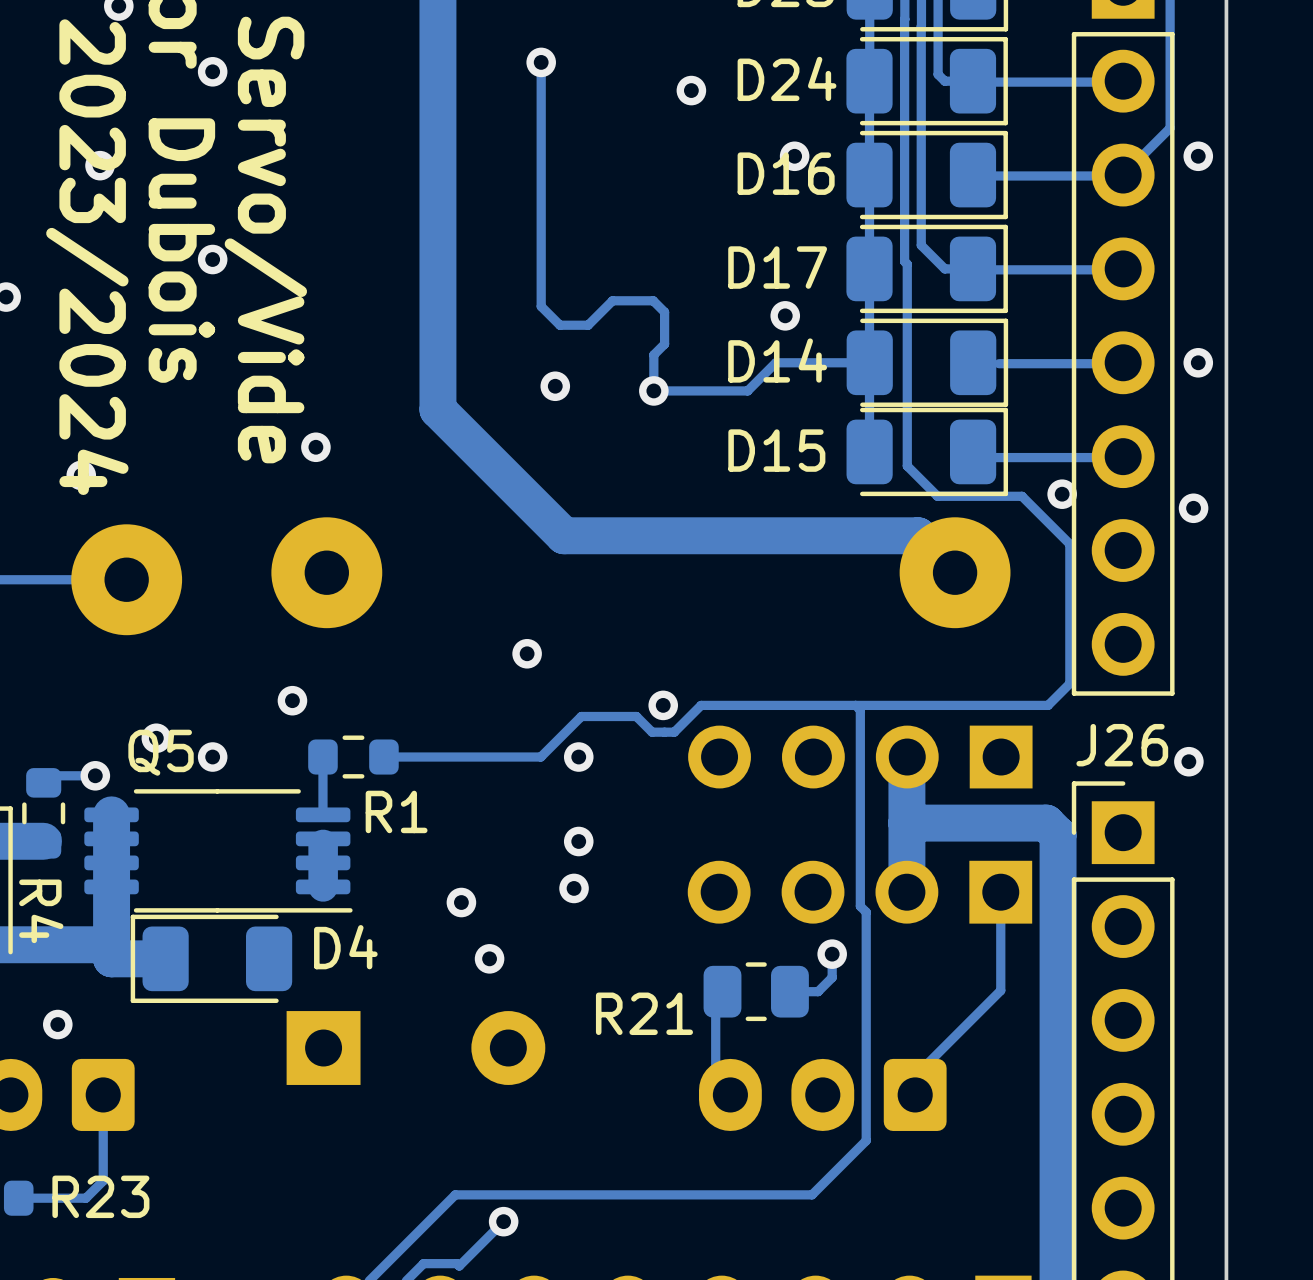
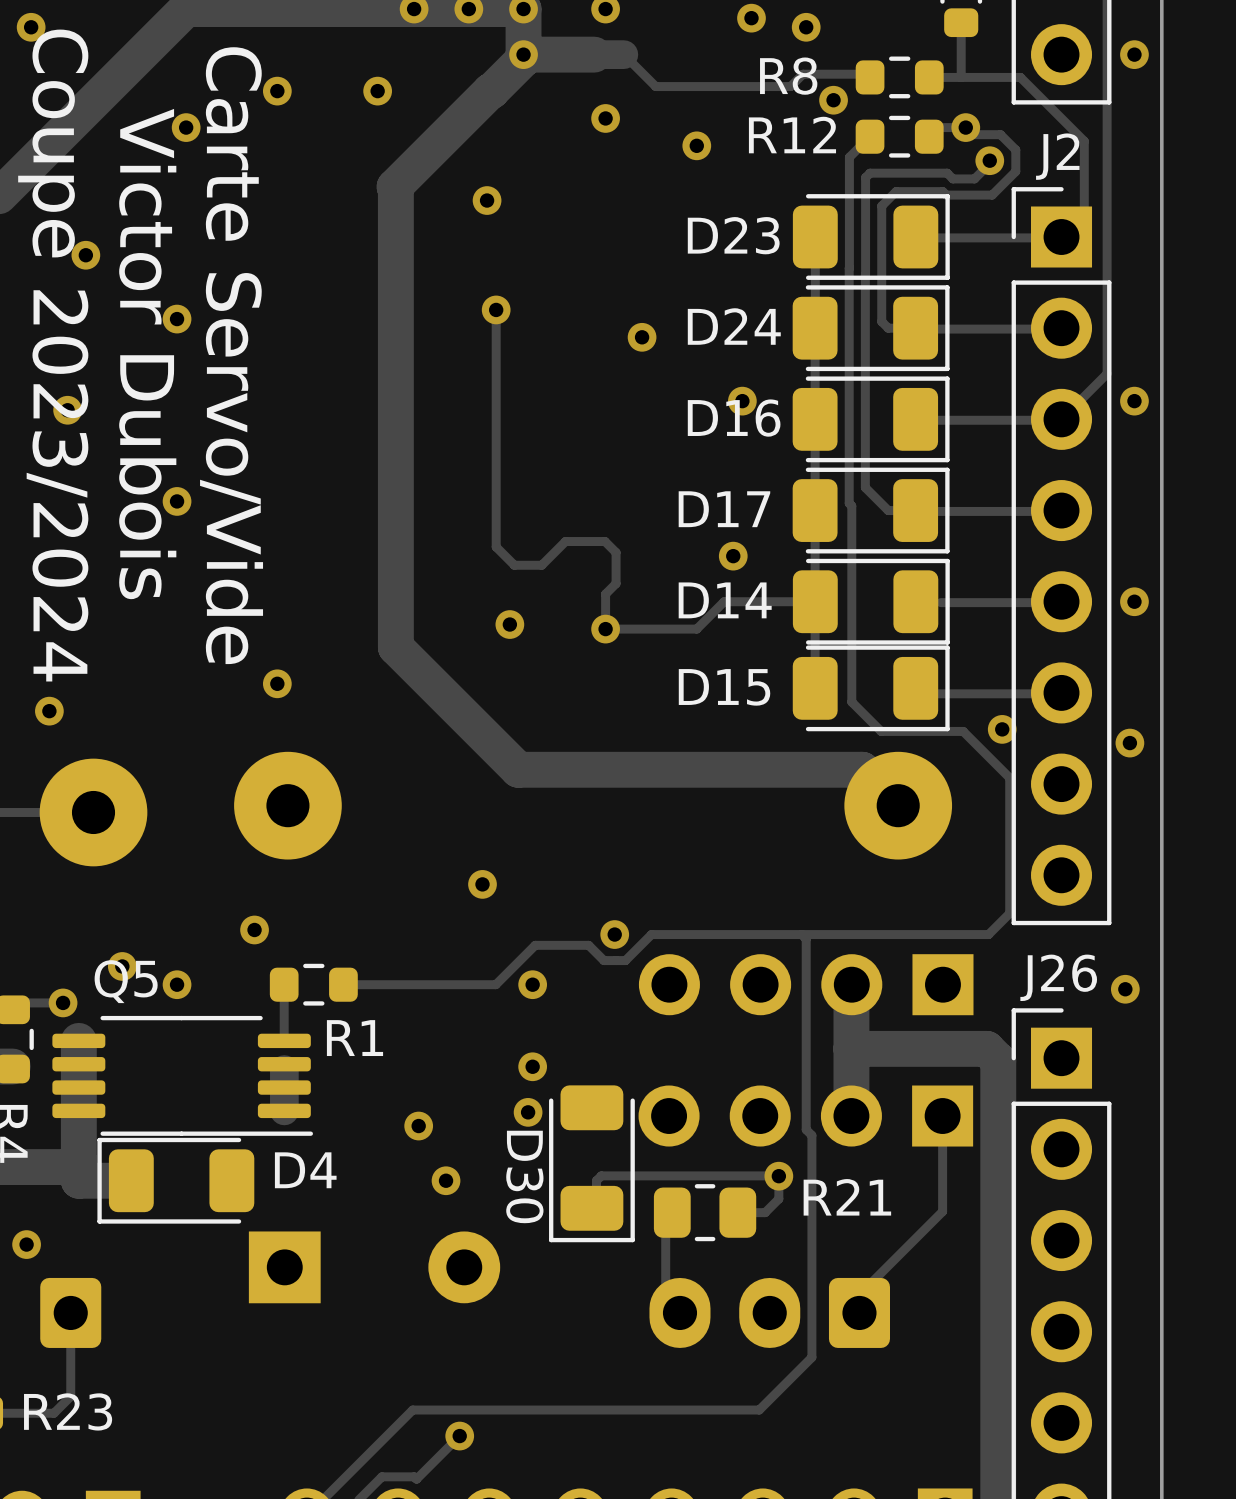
D30: none -> (591, 1163)
track: none -> (778, 1175) (601, 1175) (596, 1180) (596, 1208)
R21 name position: R21 (644, 1013) -> R21 (847, 1197)

